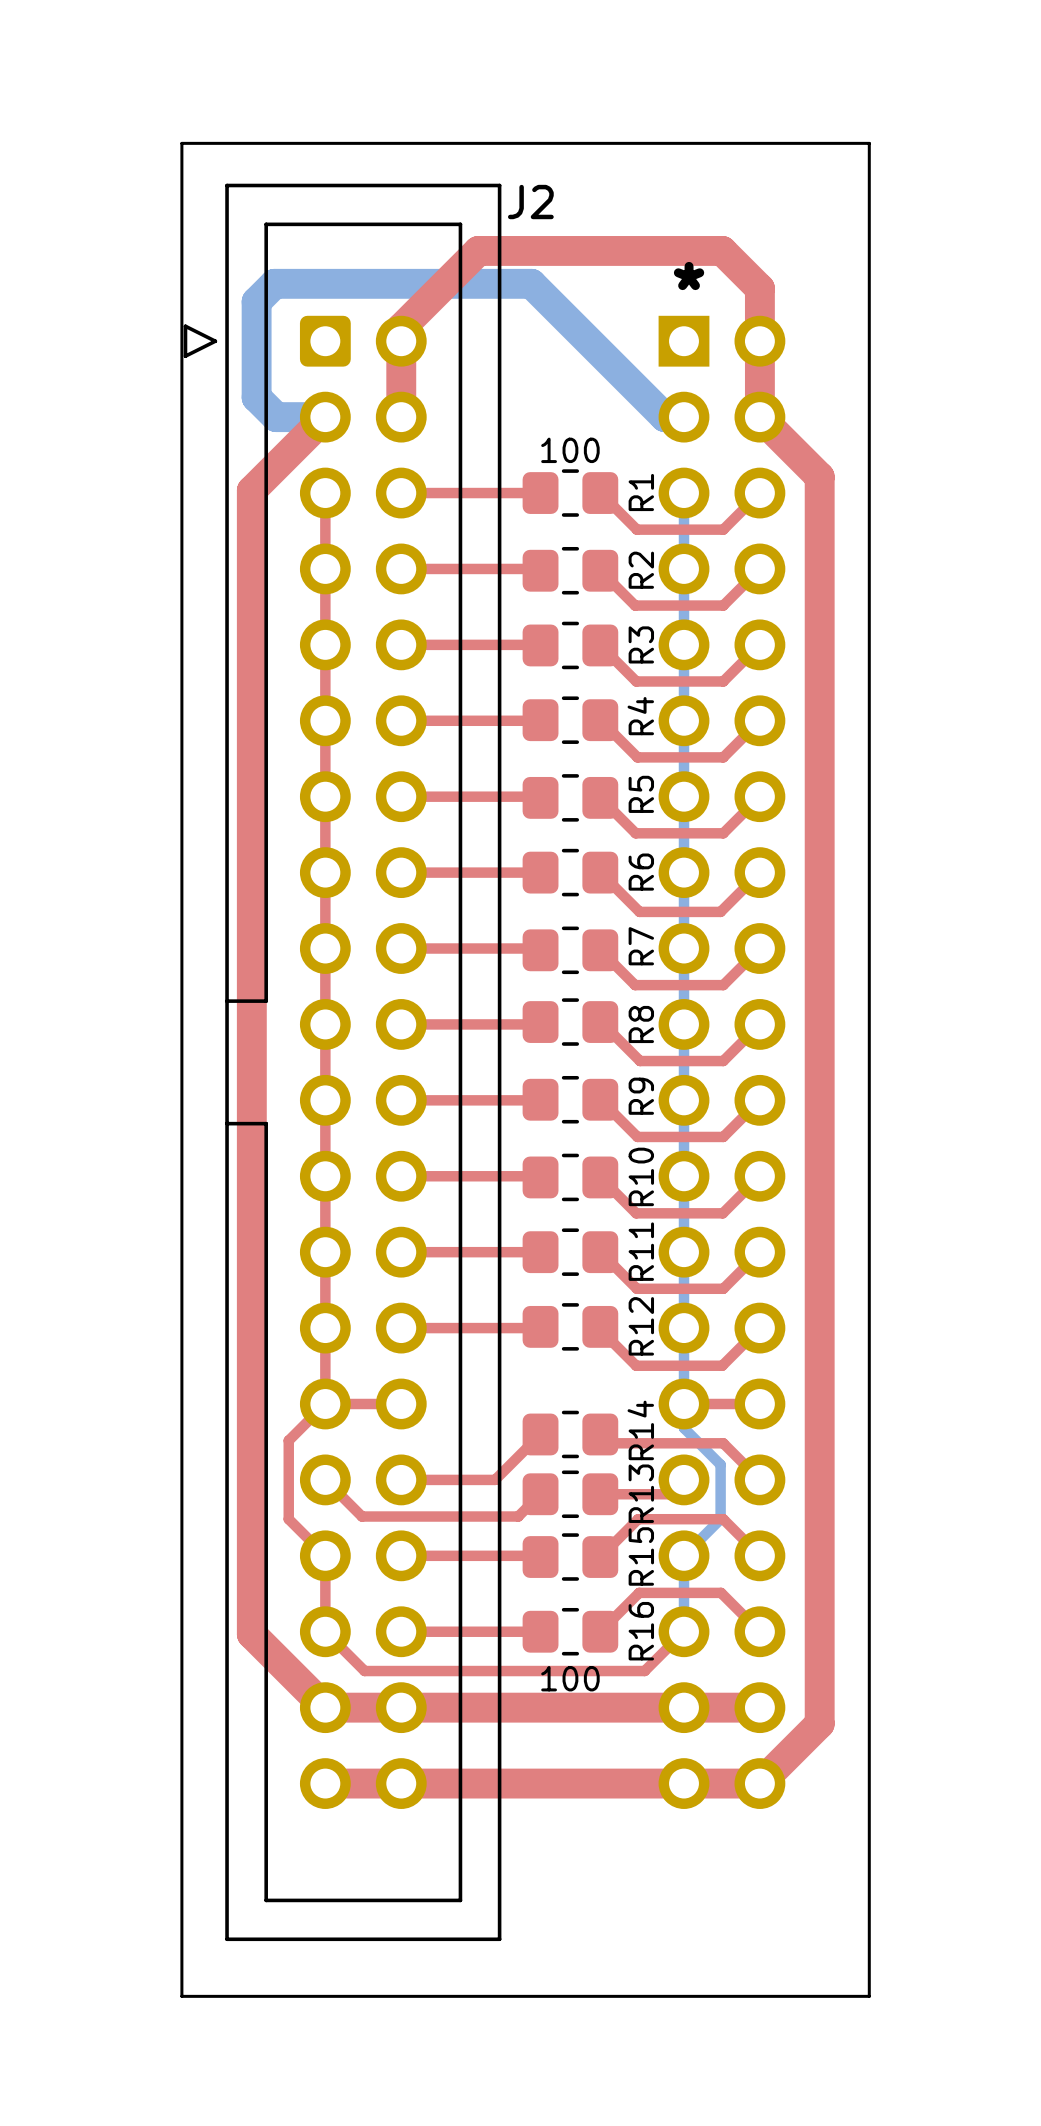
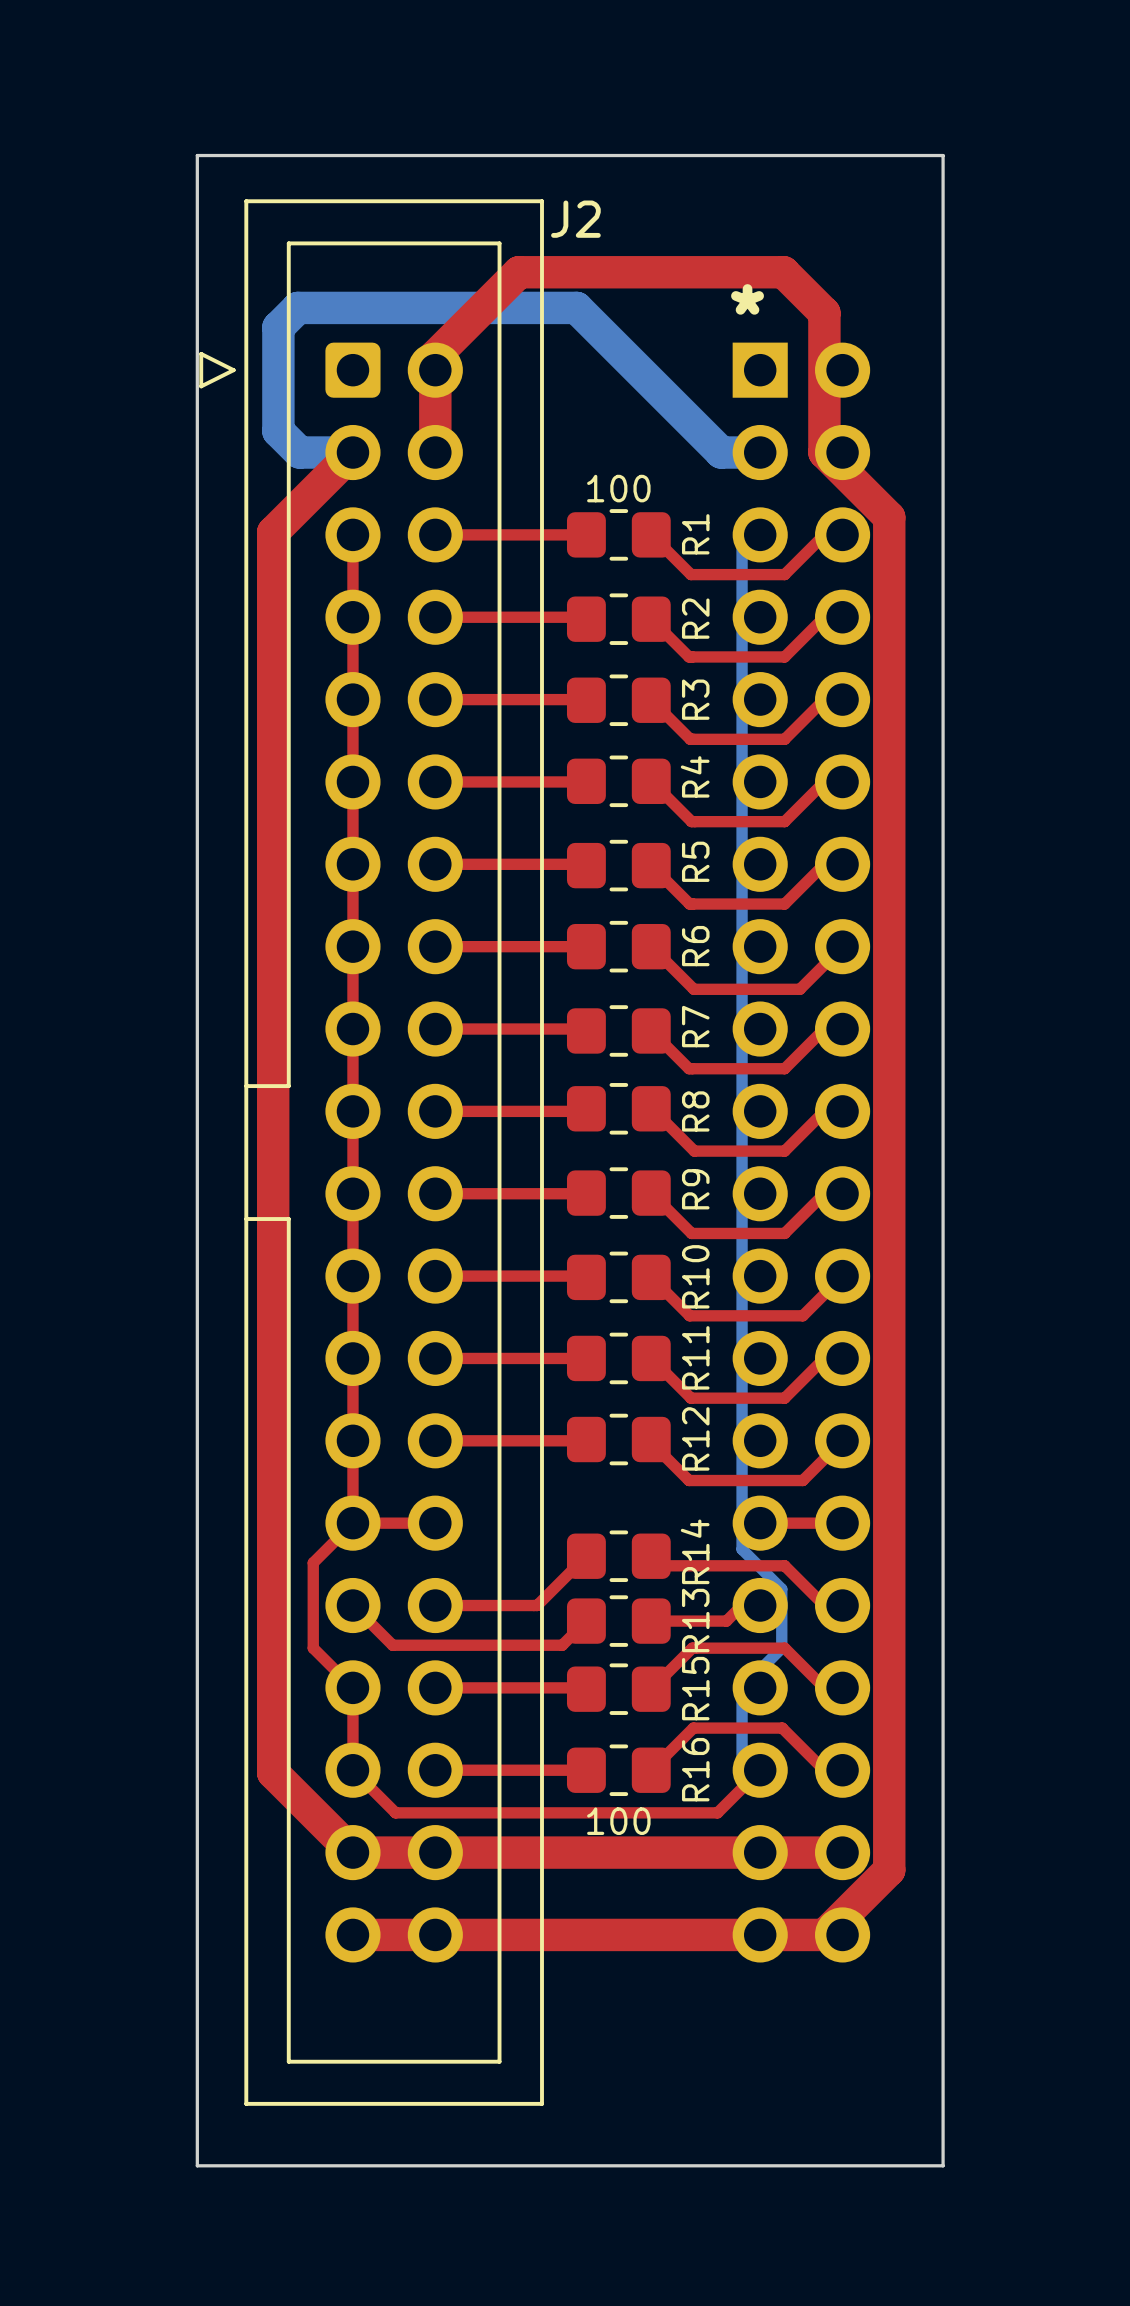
top track: (759, 872) (720, 911) -> (842, 946) (799, 989) (781, 989)
part position: (721, 1062) -> (801, 1152)
top track: (759, 1176) (722, 1213) (635, 1212) -> (842, 1276) (802, 1315) (689, 1315)
top track: (759, 1328) (722, 1365) (635, 1364) -> (842, 1440) (802, 1480) (689, 1480)
top track: (684, 1631) (644, 1671) -> (760, 1770) (717, 1812) (699, 1812)

